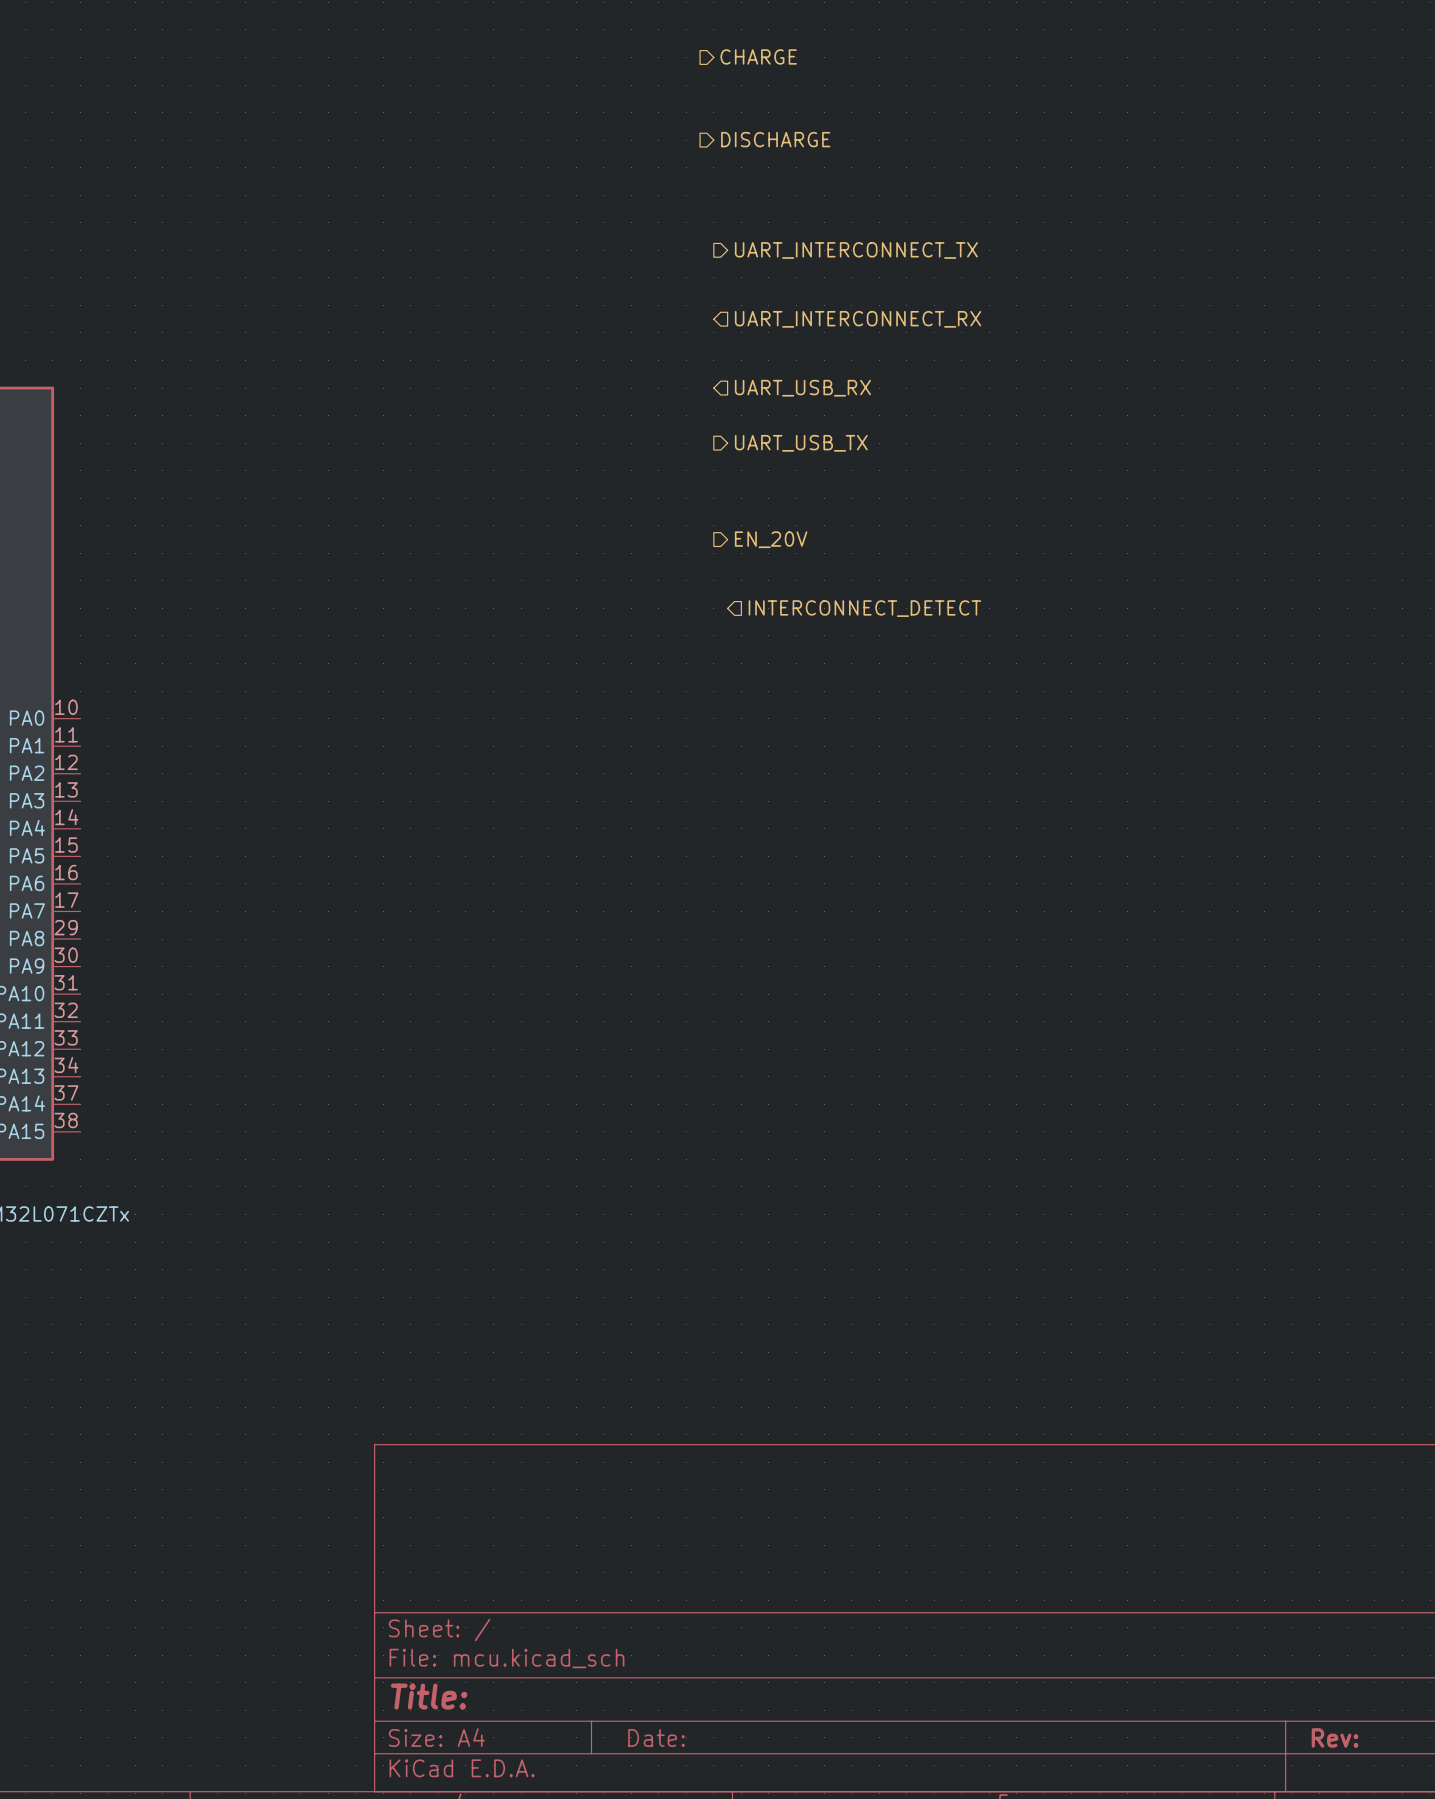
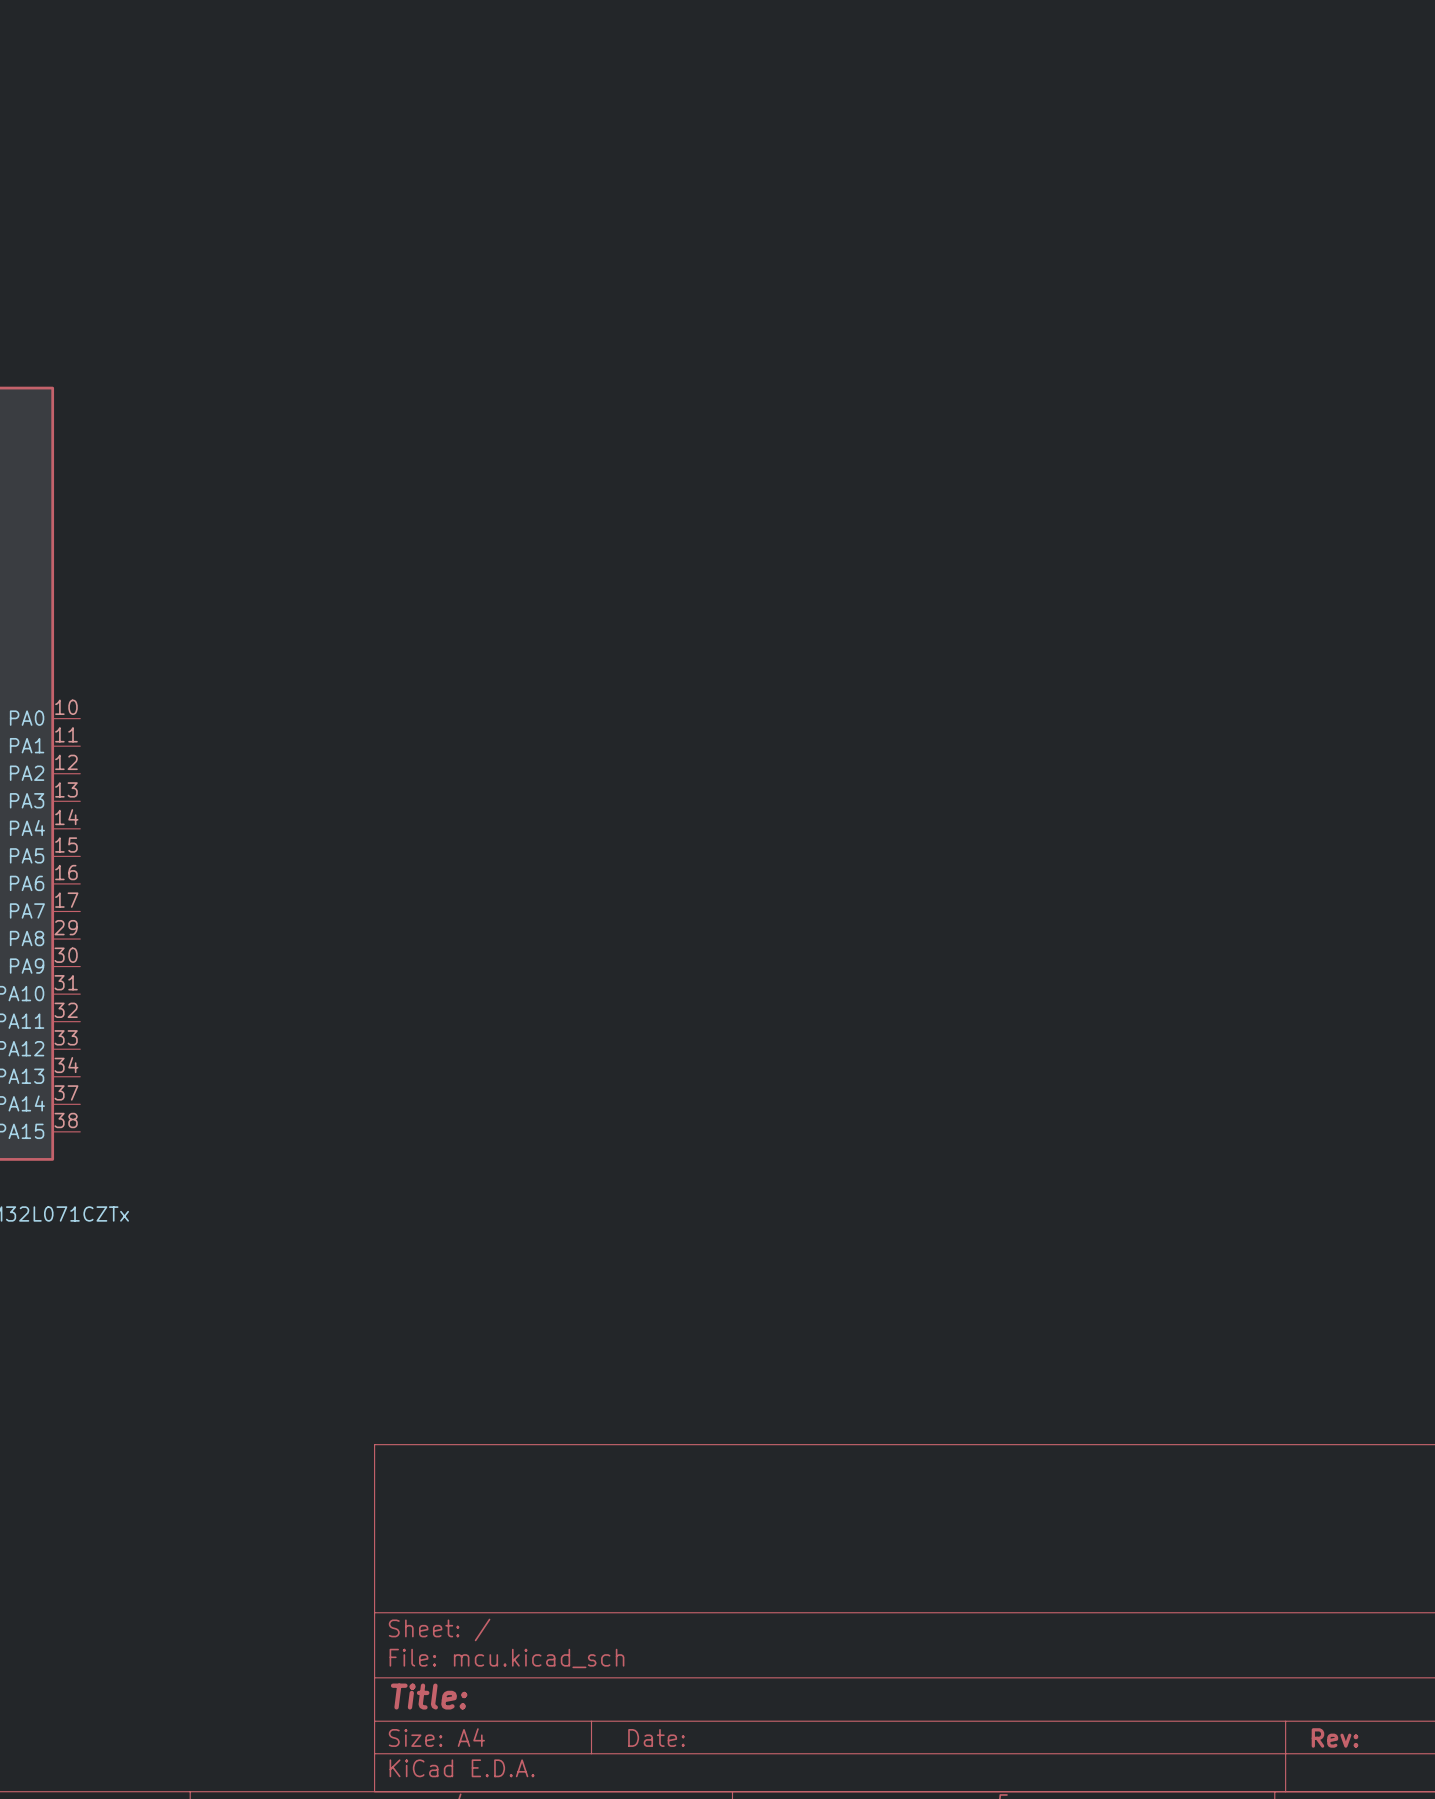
hierarchical label: CHARGE (758, 56) -> none
hierarchical label: DISCHARGE (775, 139) -> none
hierarchical label: UART_INTERCONNECT_TX (856, 250) -> none
hierarchical label: UART_INTERCONNECT_RX (858, 319) -> none
hierarchical label: UART_USB_RX (802, 388) -> none
hierarchical label: UART_USB_TX (801, 443) -> none
hierarchical label: EN_20V (771, 539) -> none
hierarchical label: INTERCONNECT_DETECT (864, 608) -> none

